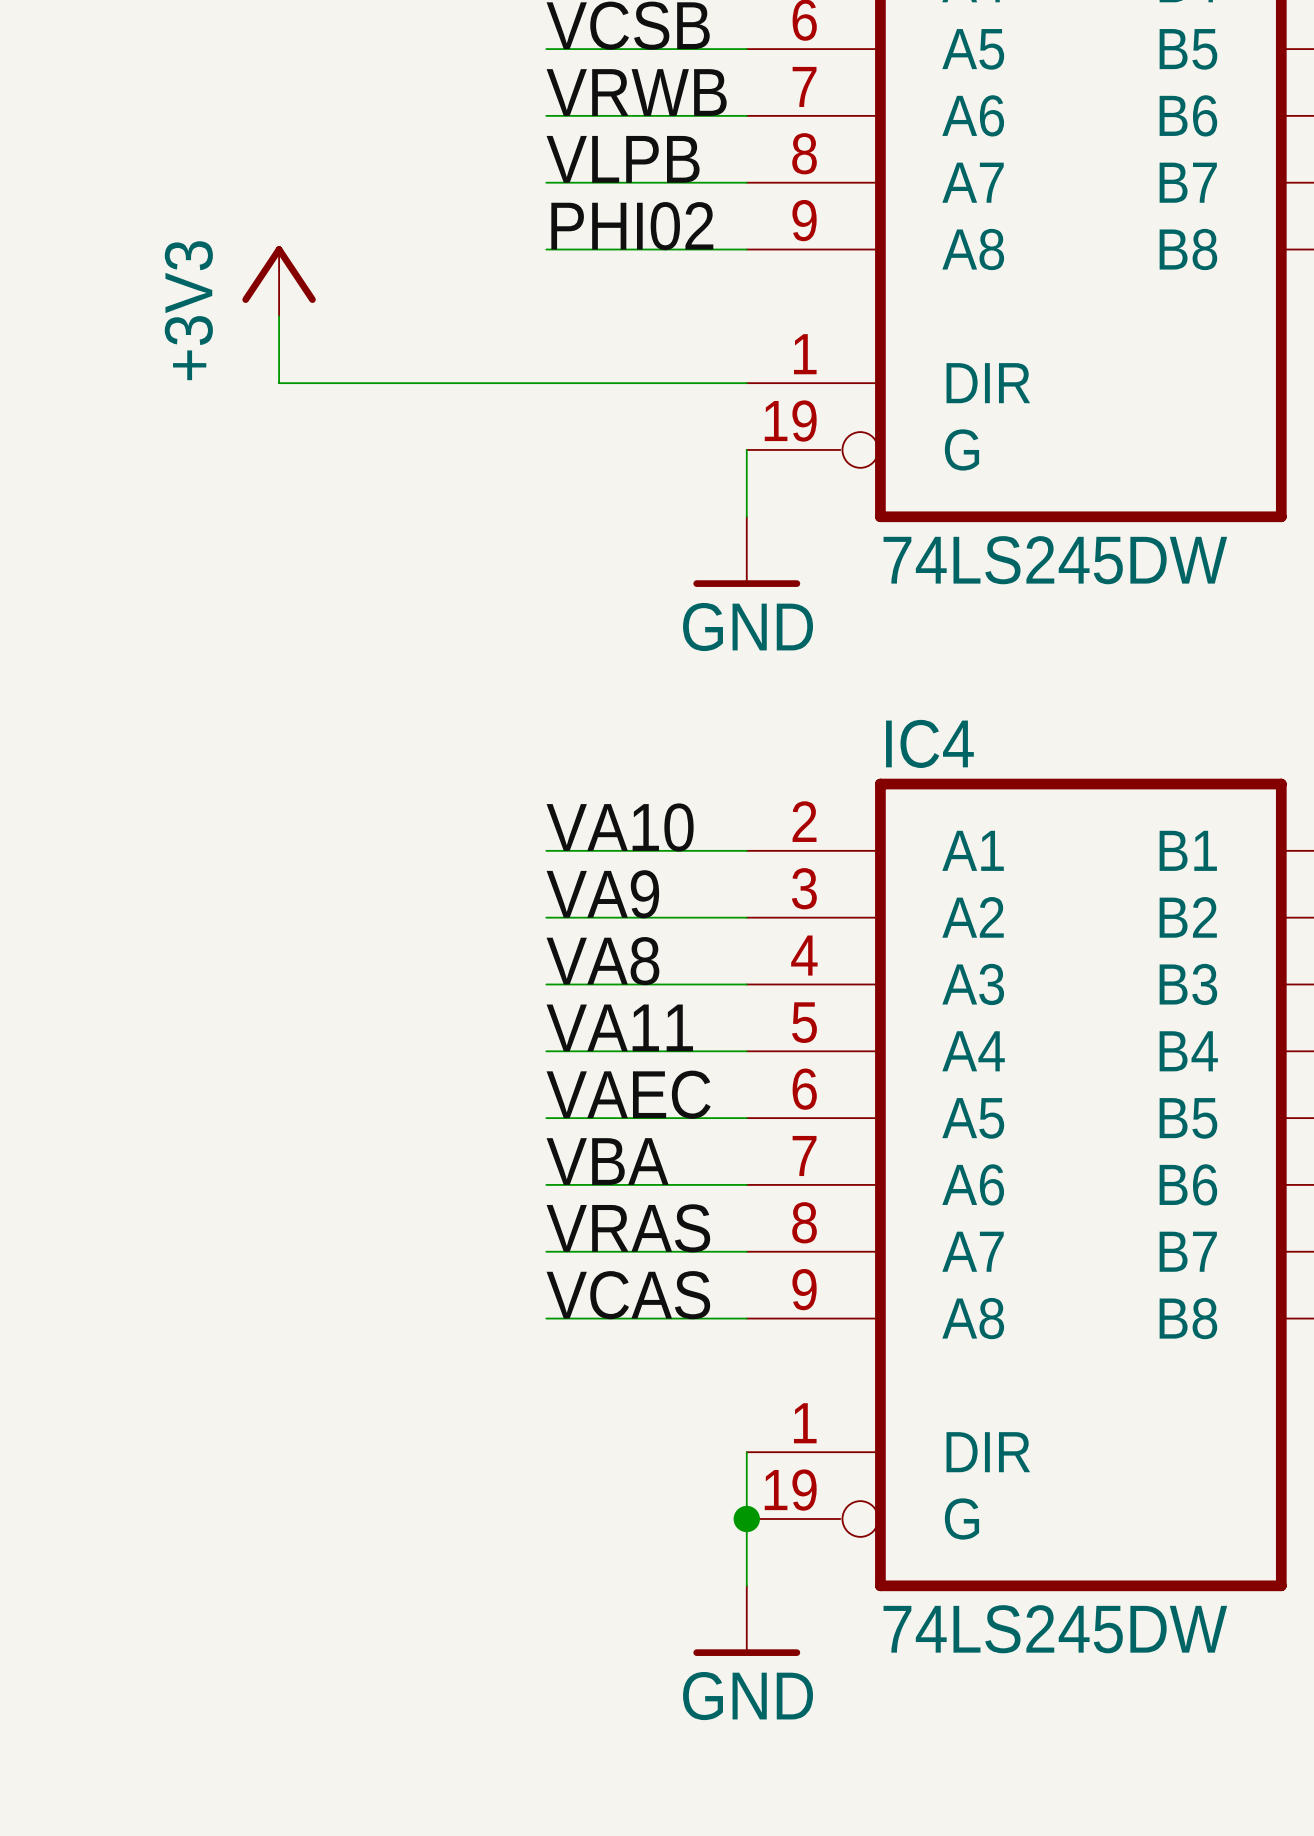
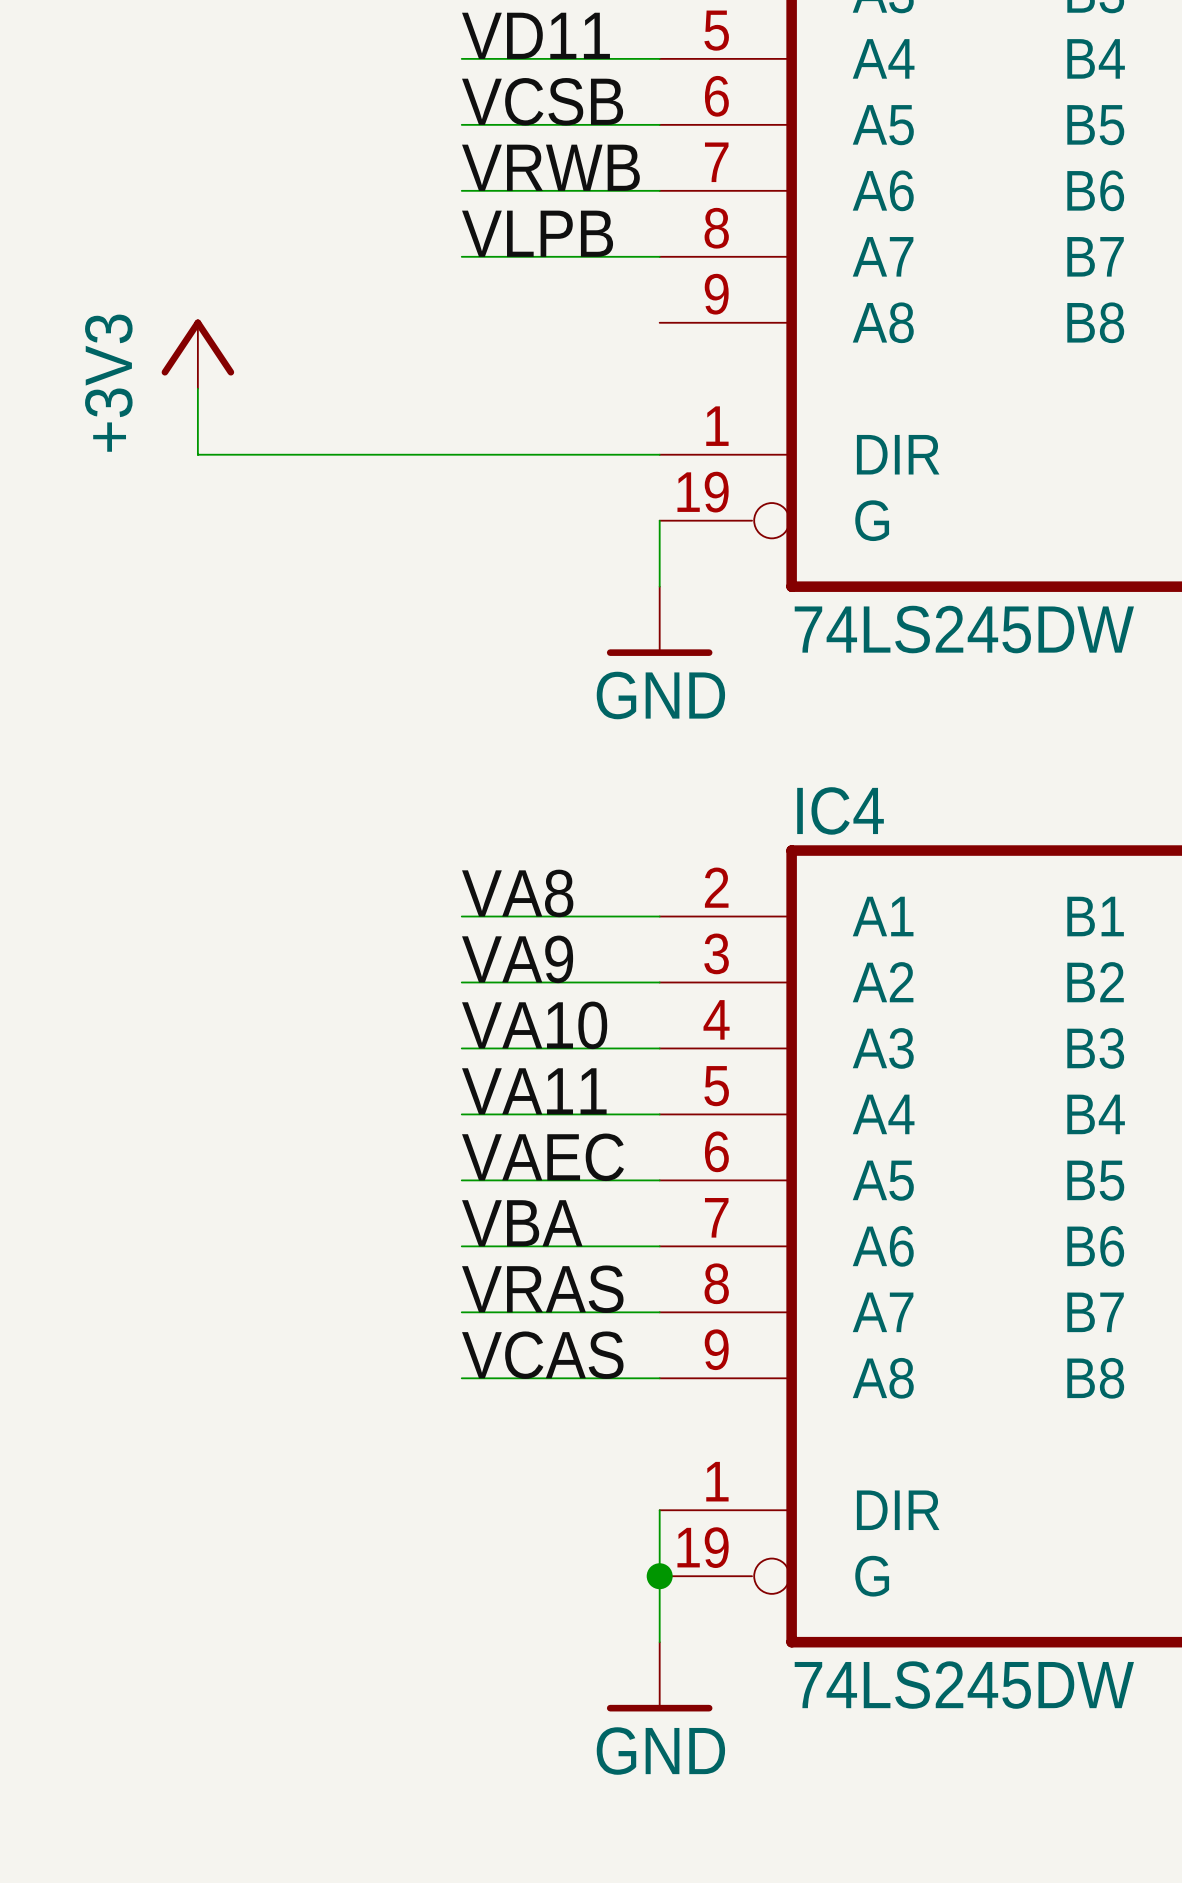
label: PHI02 (632, 226) -> none
wire: (546, 249) (746, 249) -> none
label: VA10 (620, 827) -> VA8 (517, 893)
label: VA8 (602, 961) -> VA10 (534, 1025)

